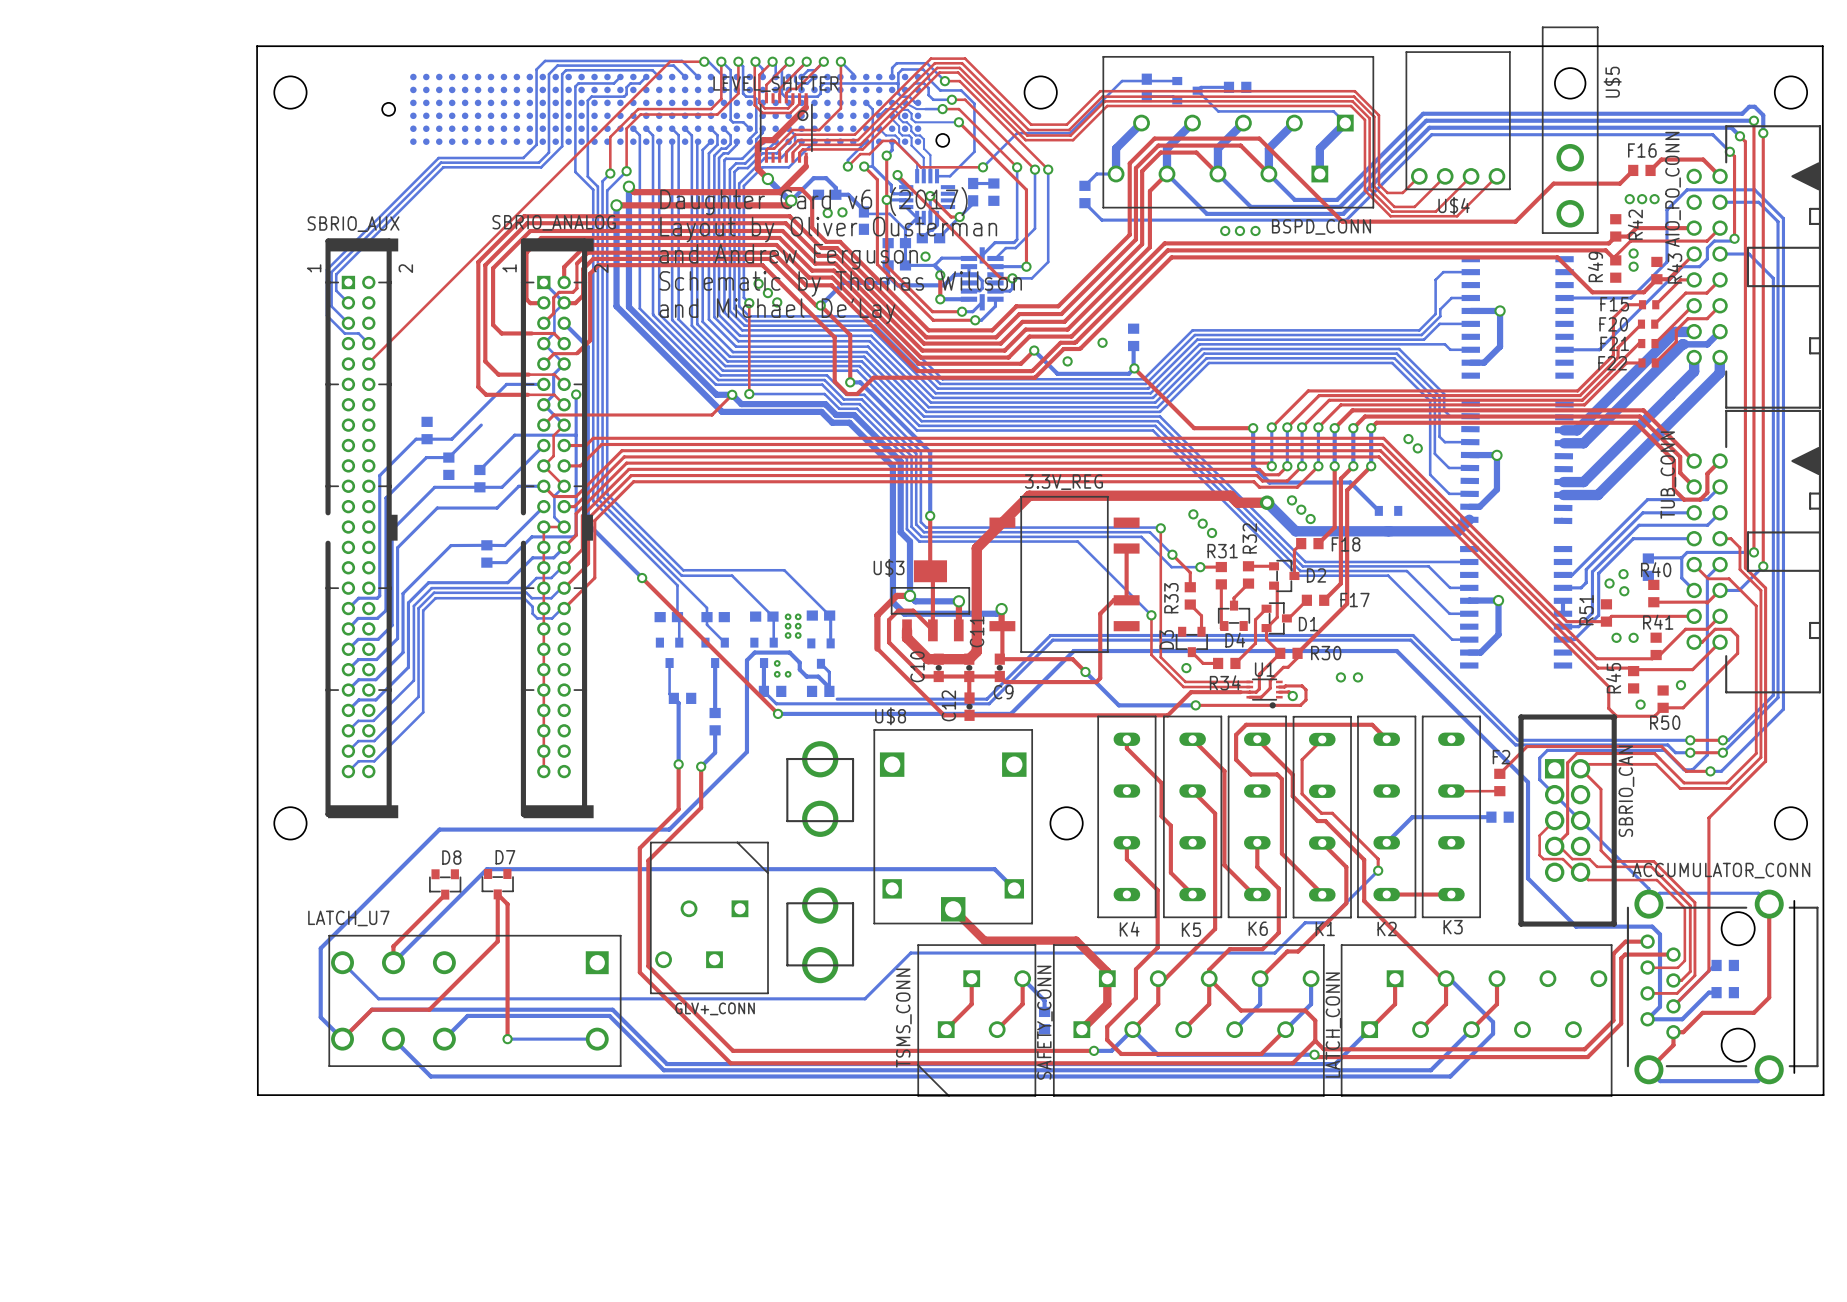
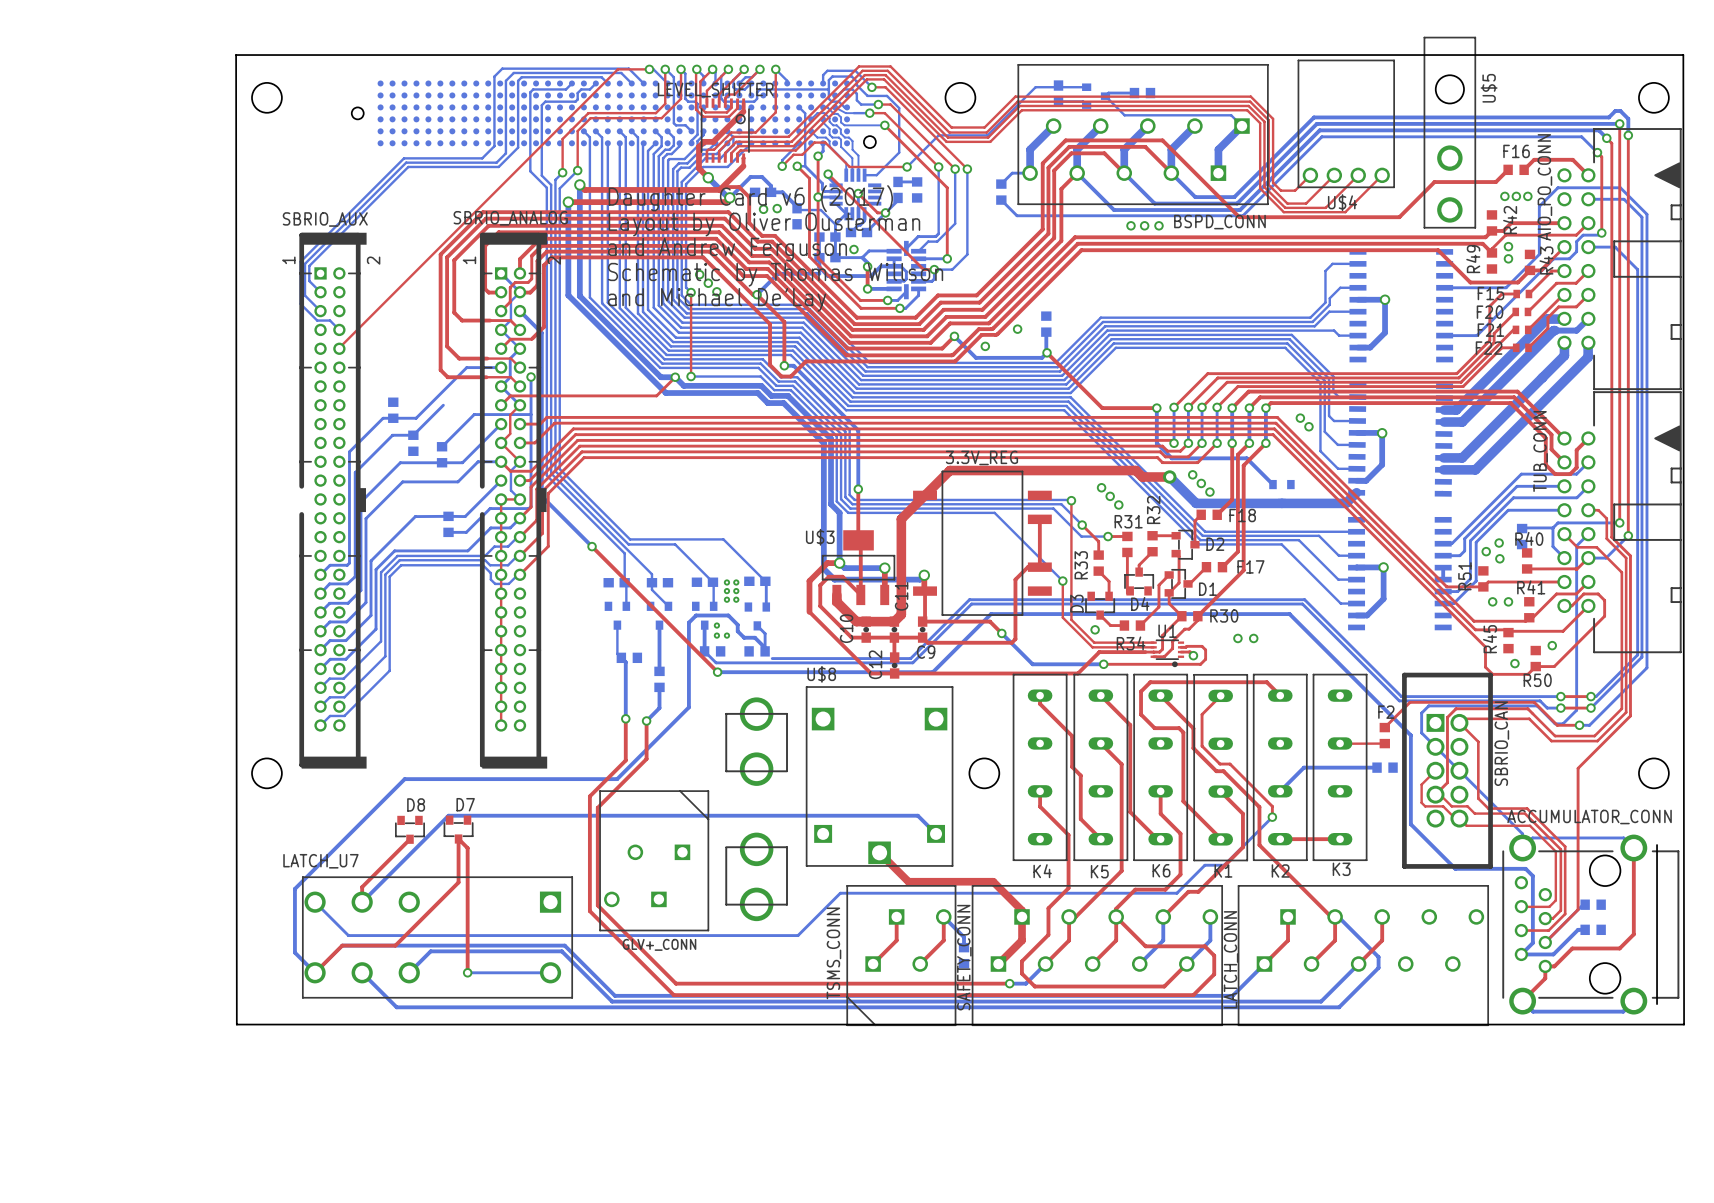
top track: (1647, 941) (1625, 941) (1613, 953) (1613, 1020) (1584, 1049) (1323, 1049) (1315, 1040) -> none
top track: (1673, 954) (1625, 954) (1621, 958) (1621, 1023) (1587, 1057) (1316, 1057) (1314, 1054) -> none
bottom track: (1132, 1029) (1157, 1054) (1314, 1054) -> none
via: (1314, 1054) -> none

